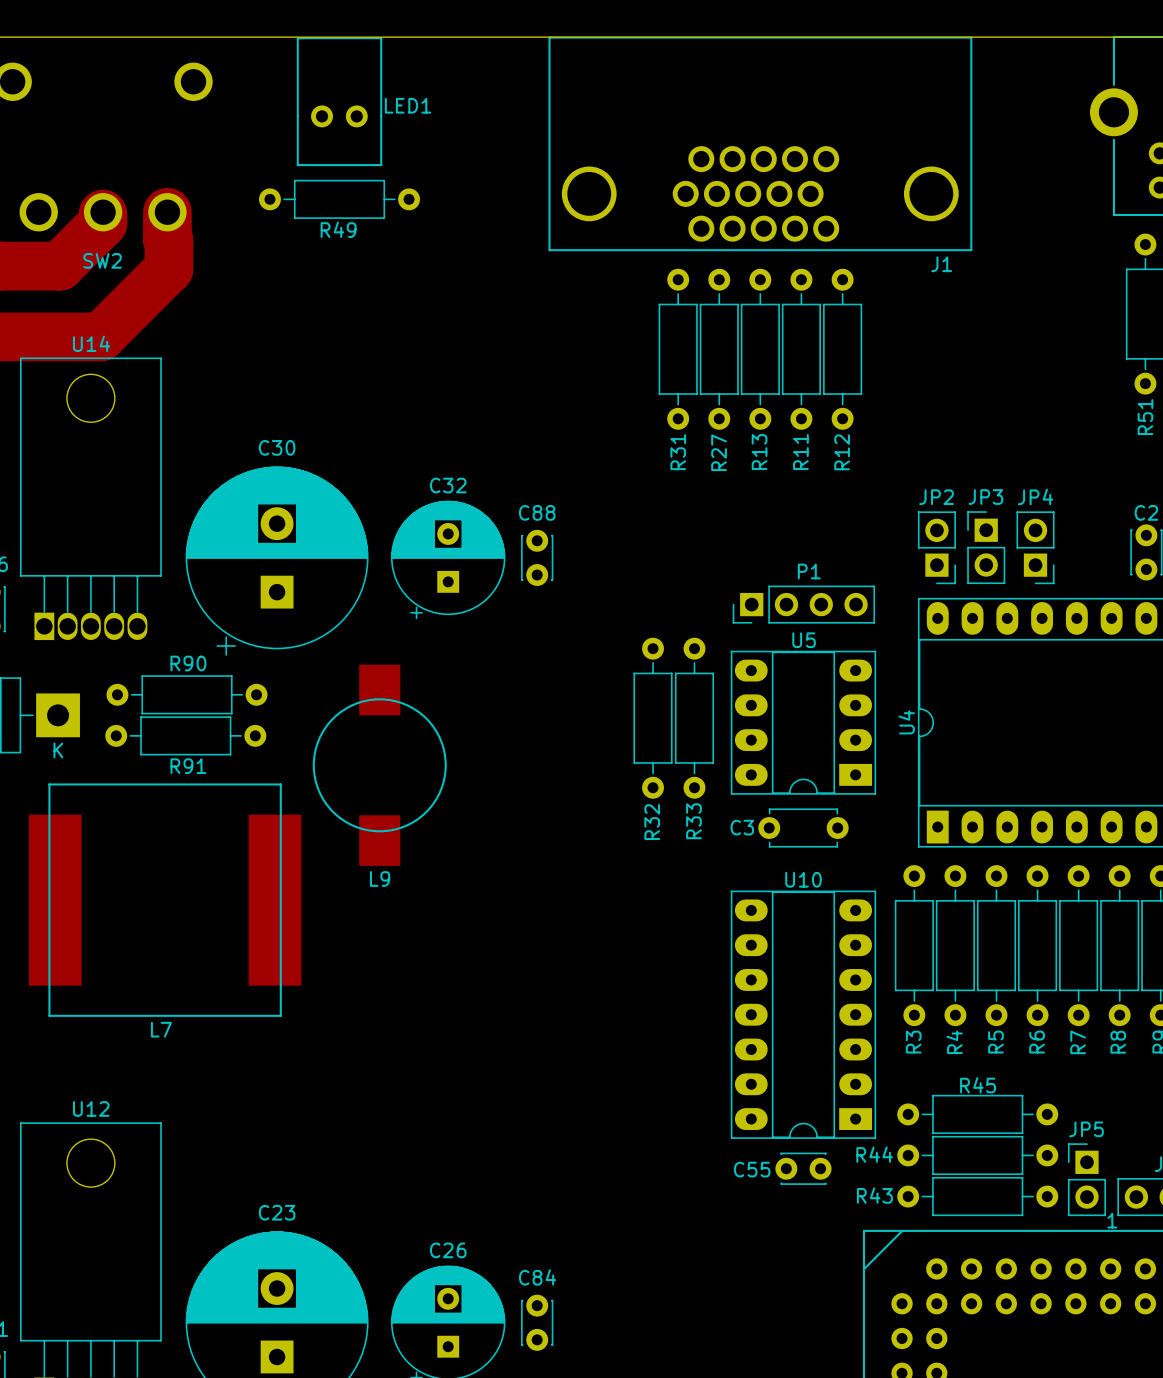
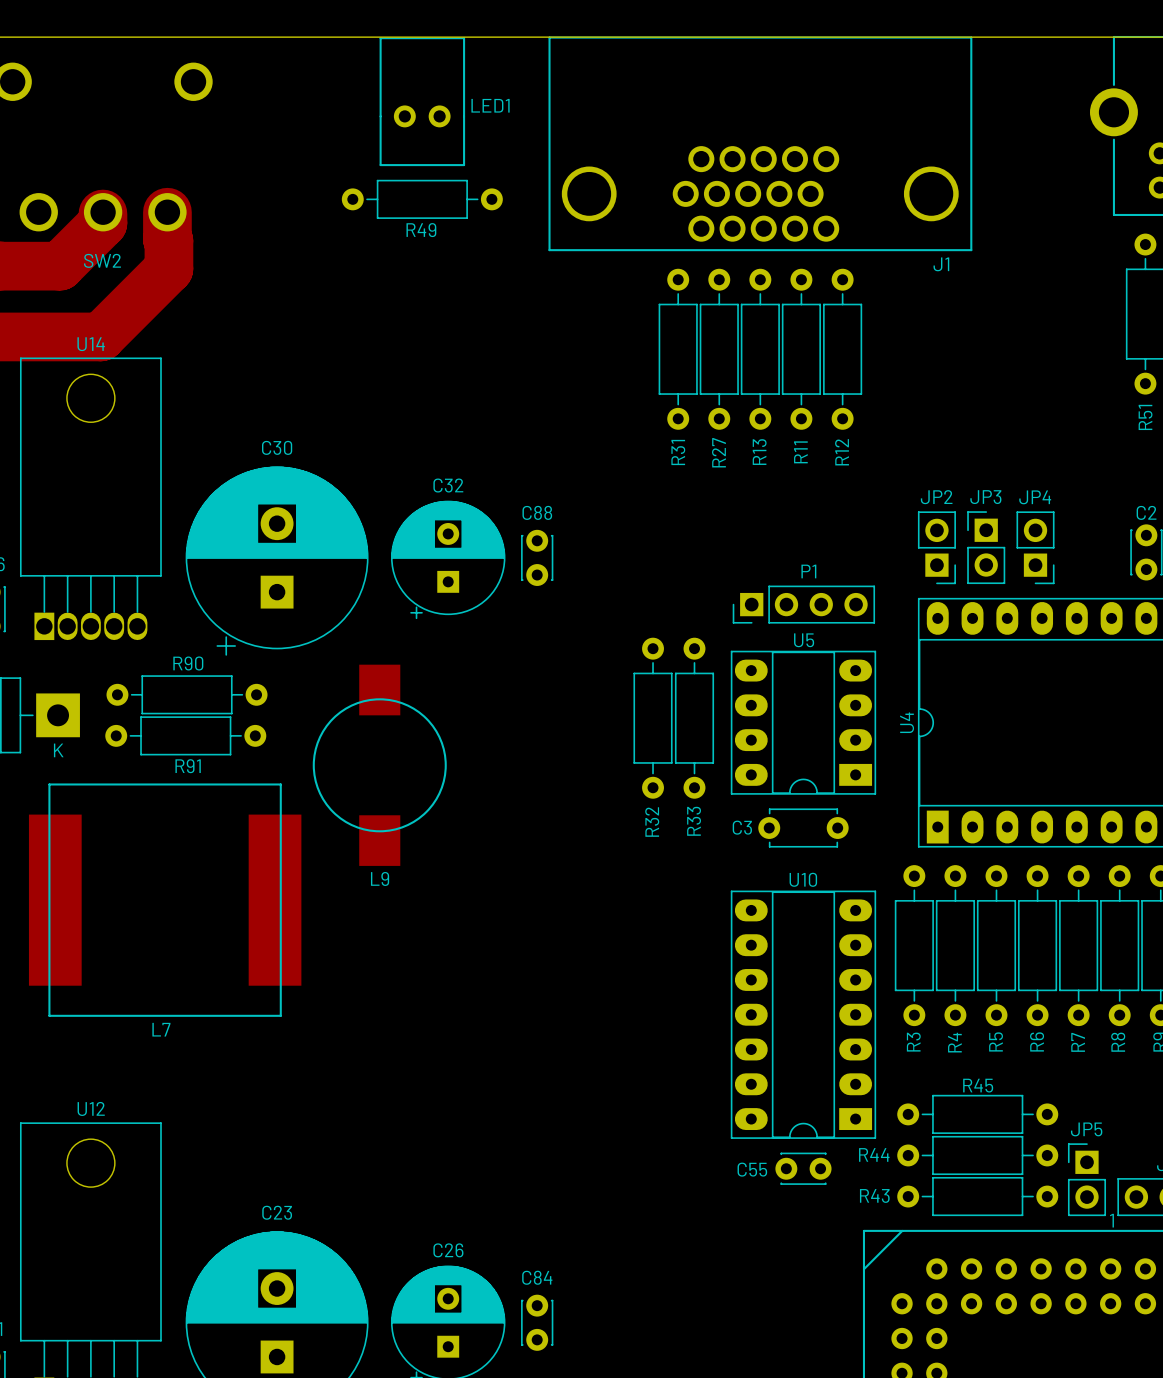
LED1 position: (339, 101) -> (422, 101)
R49 position: (339, 199) -> (422, 199)

